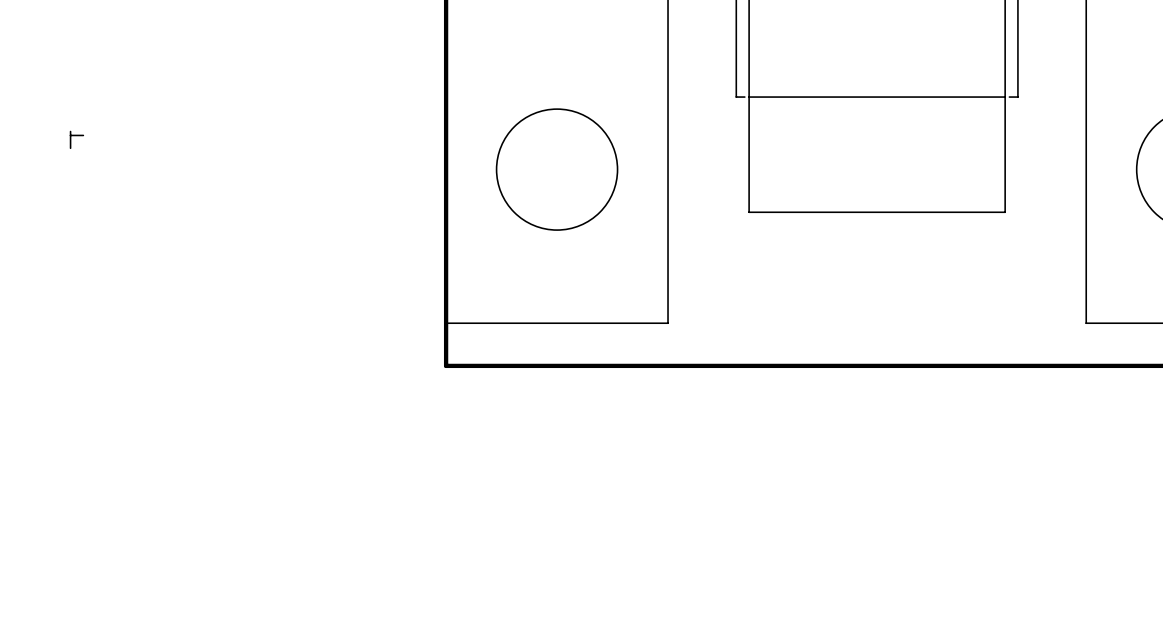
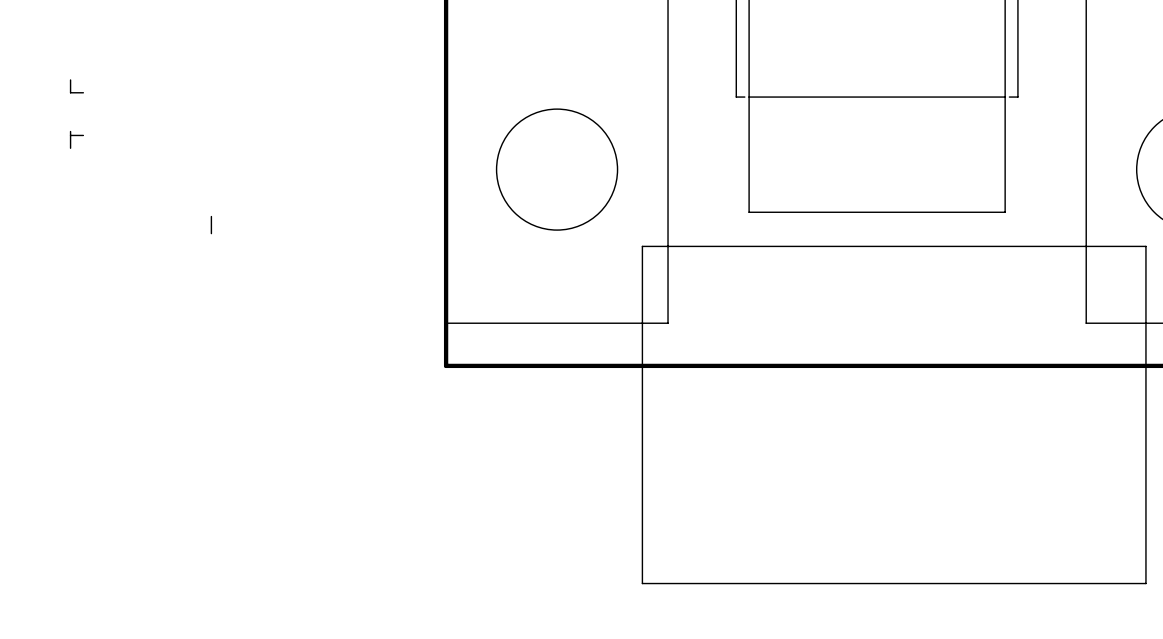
board edge: none -> (70, 79) (70, 92) (83, 92)
board edge: none -> (211, 216) (211, 233)
board edge: none -> (642, 246) (1145, 246) (1145, 583) (642, 583) (642, 246)

